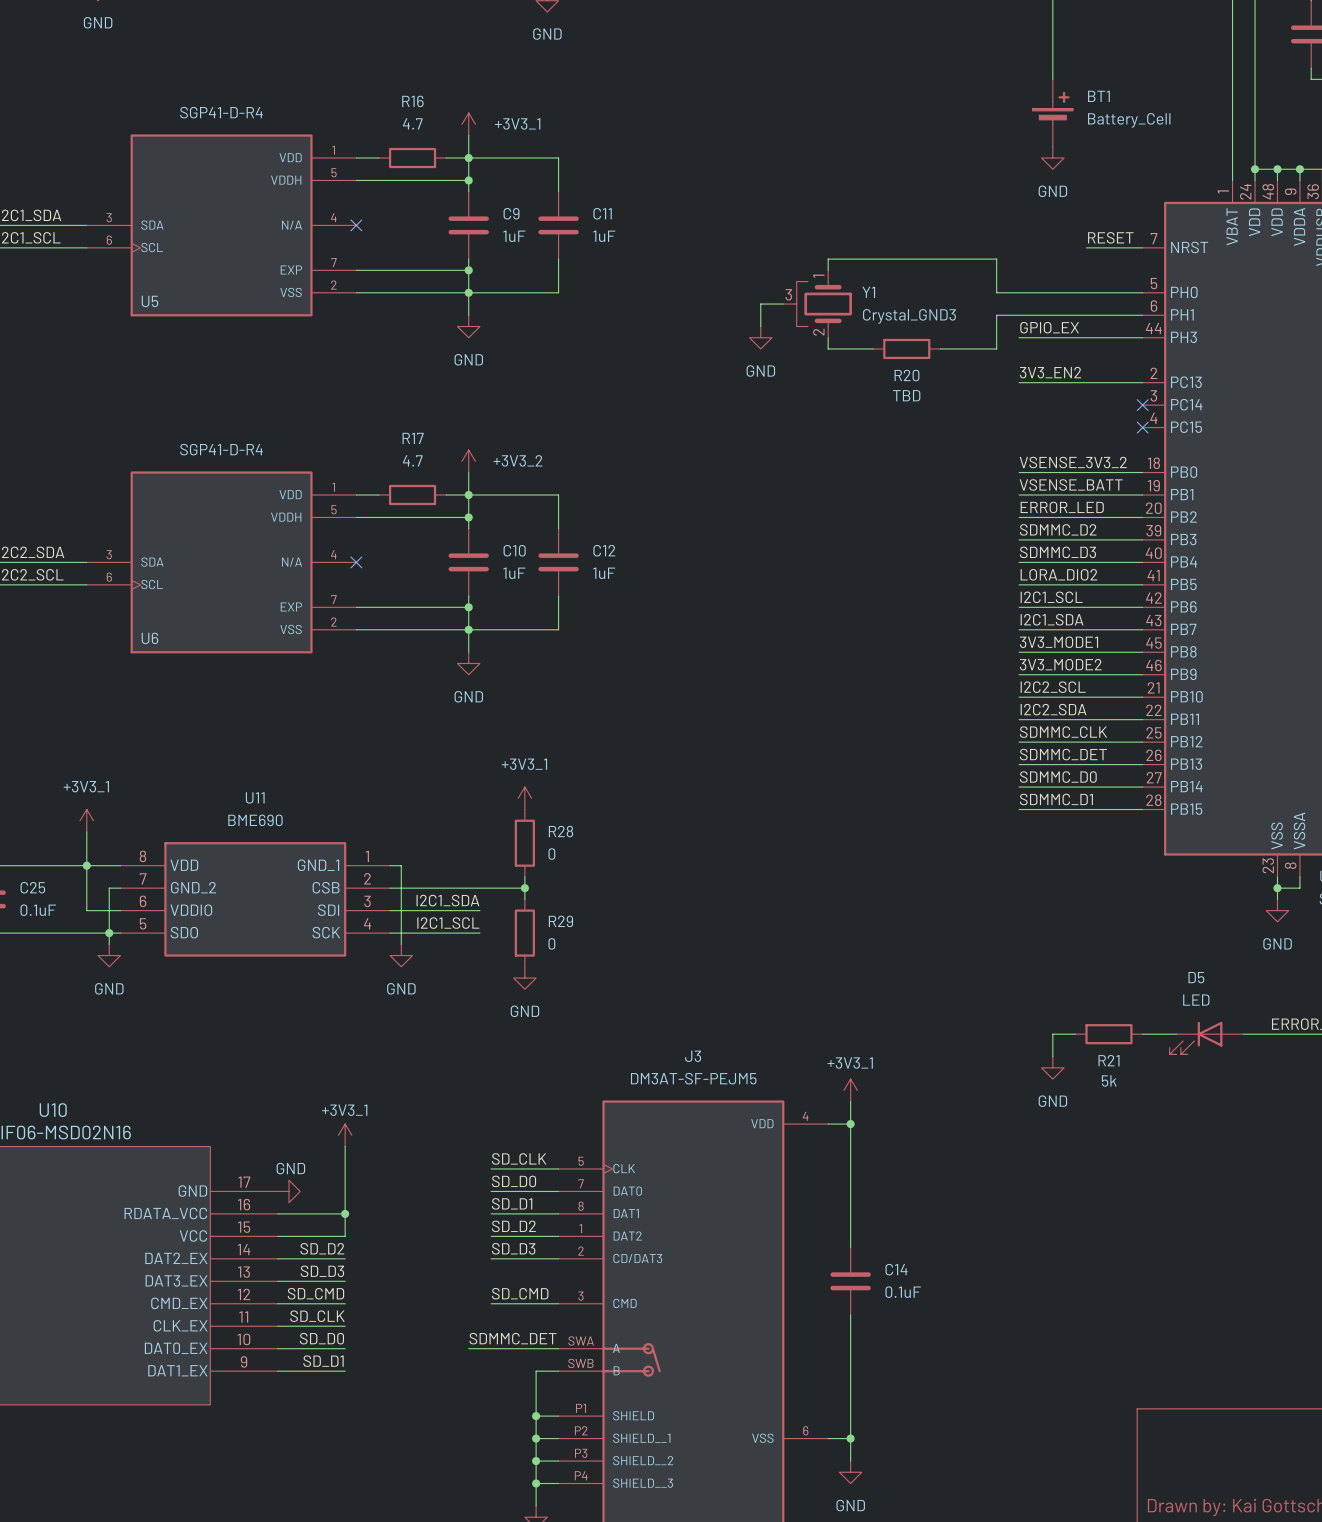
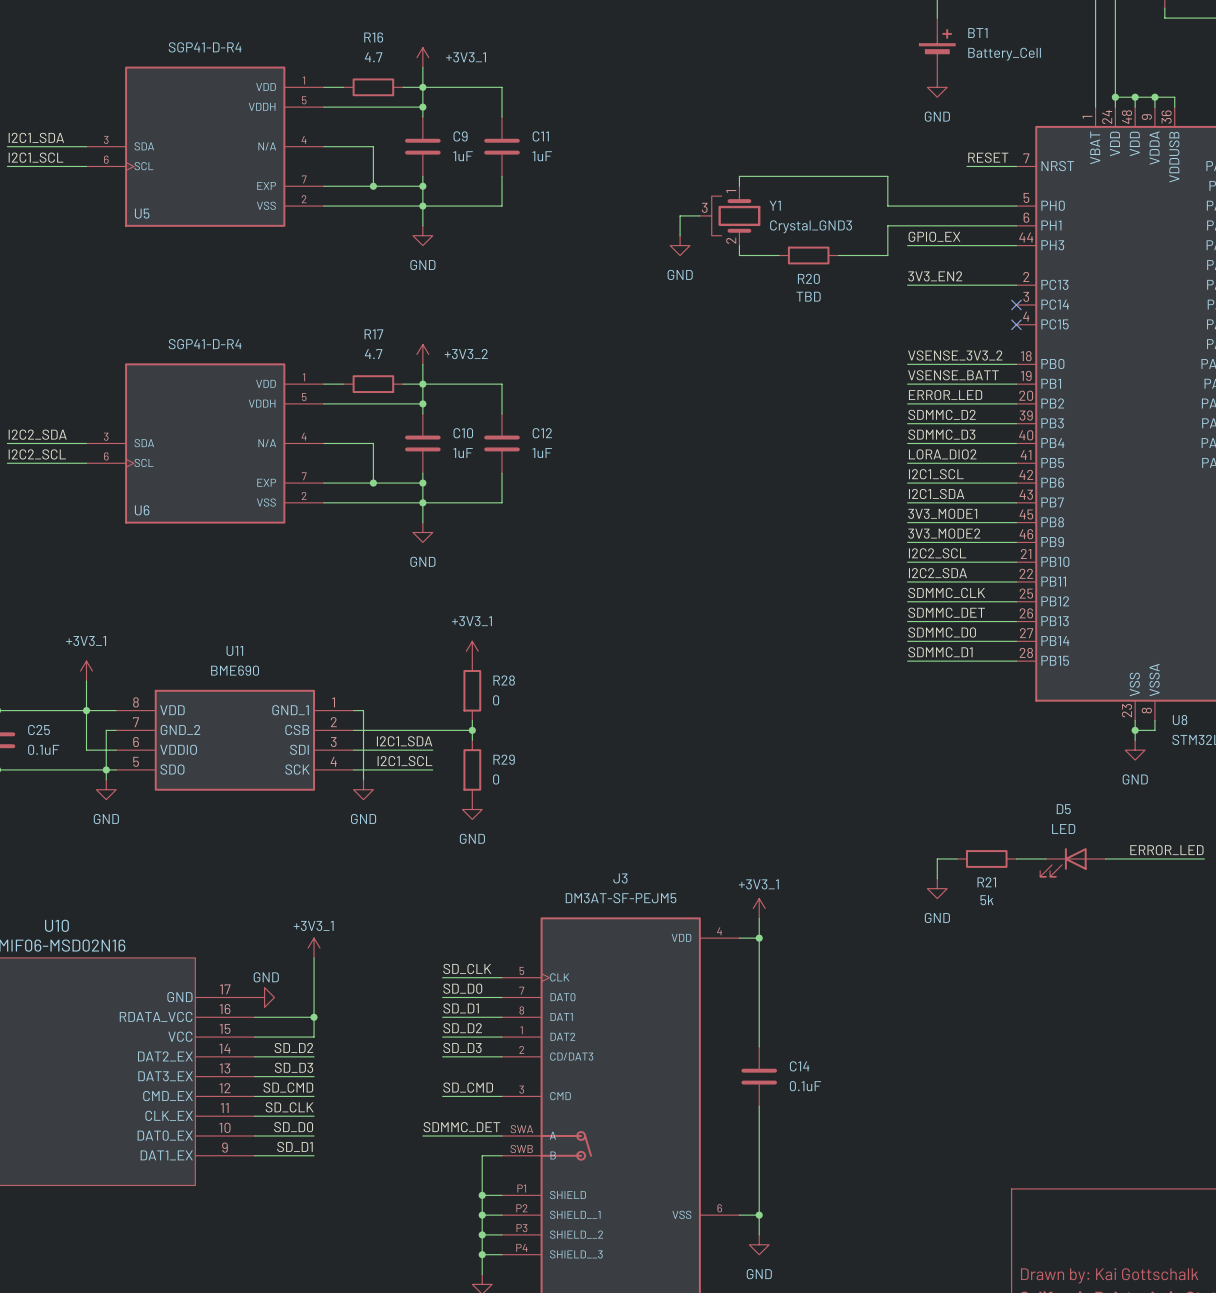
wire: none -> (323, 146) (373, 146) (373, 186)
no-connect mark: (356, 225) -> none
junction: none -> (373, 186)
wire: none -> (323, 443) (373, 443) (373, 483)
no-connect mark: (356, 562) -> none
junction: none -> (373, 483)

